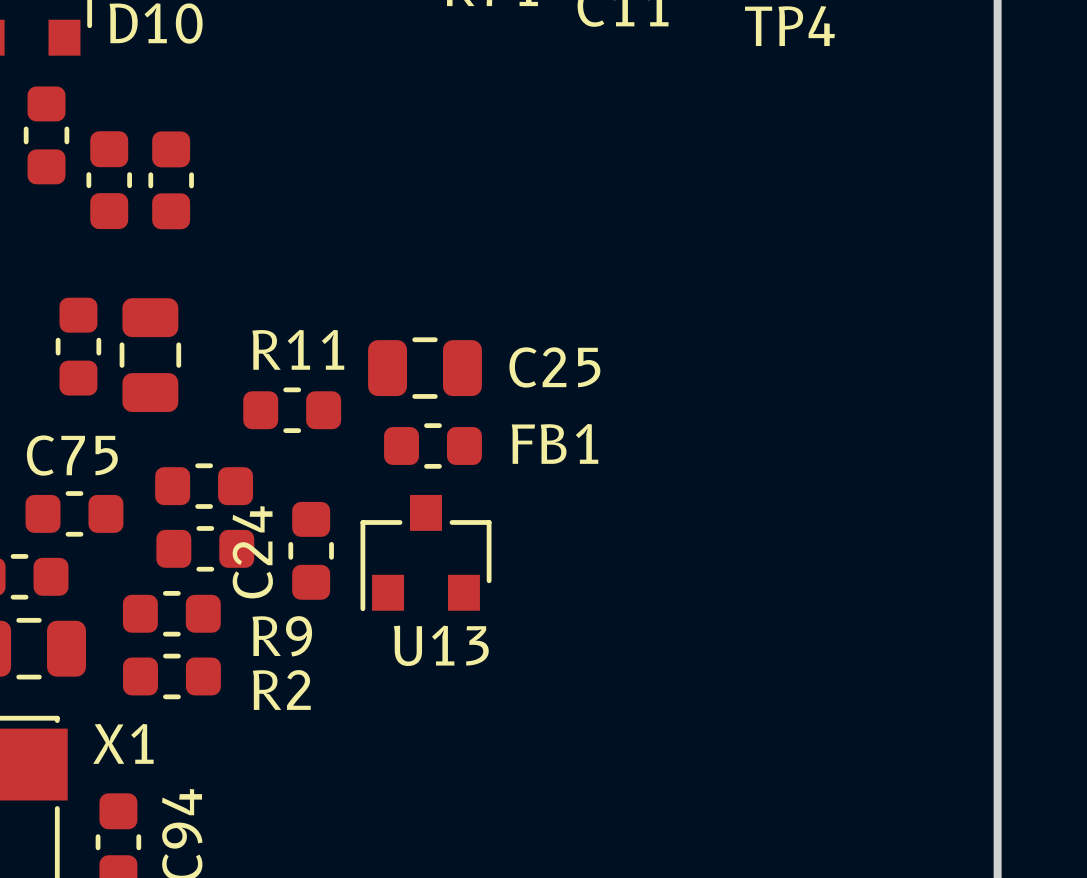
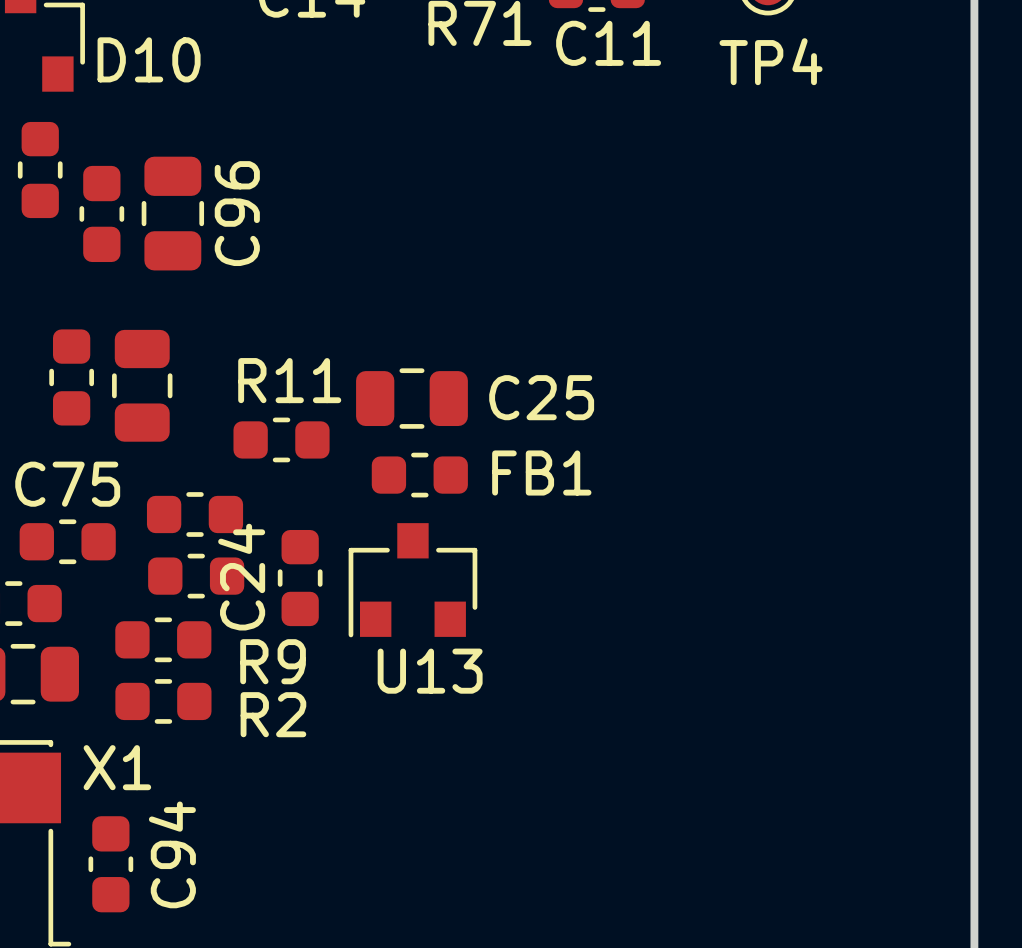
C96: none -> (172, 213)
part: (171, 180) -> none

